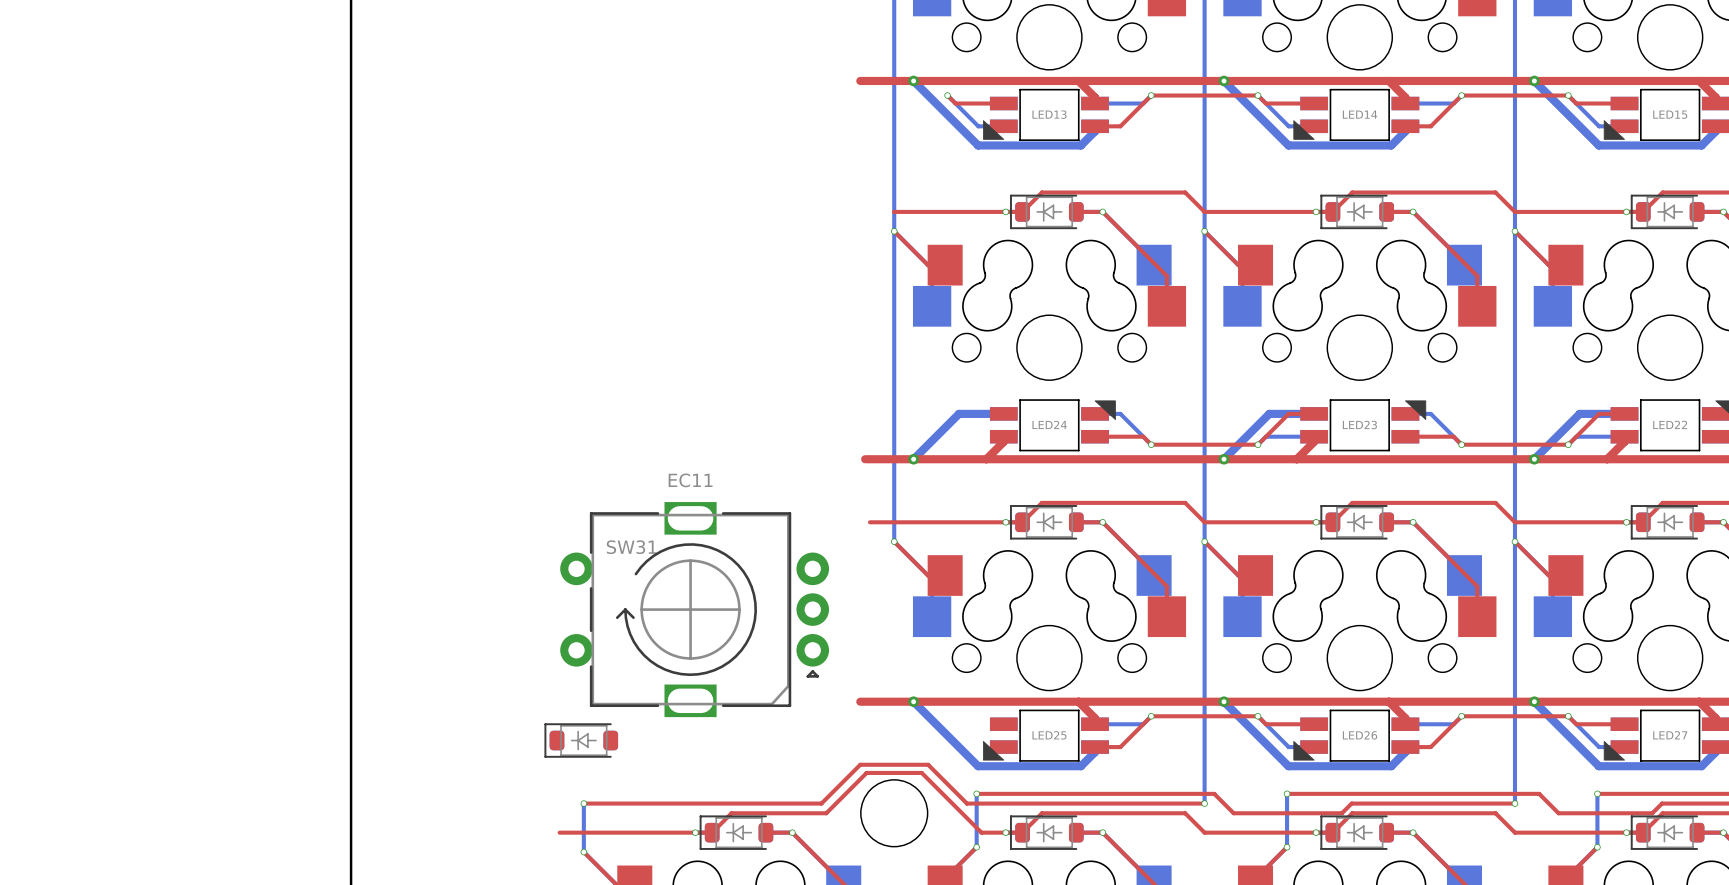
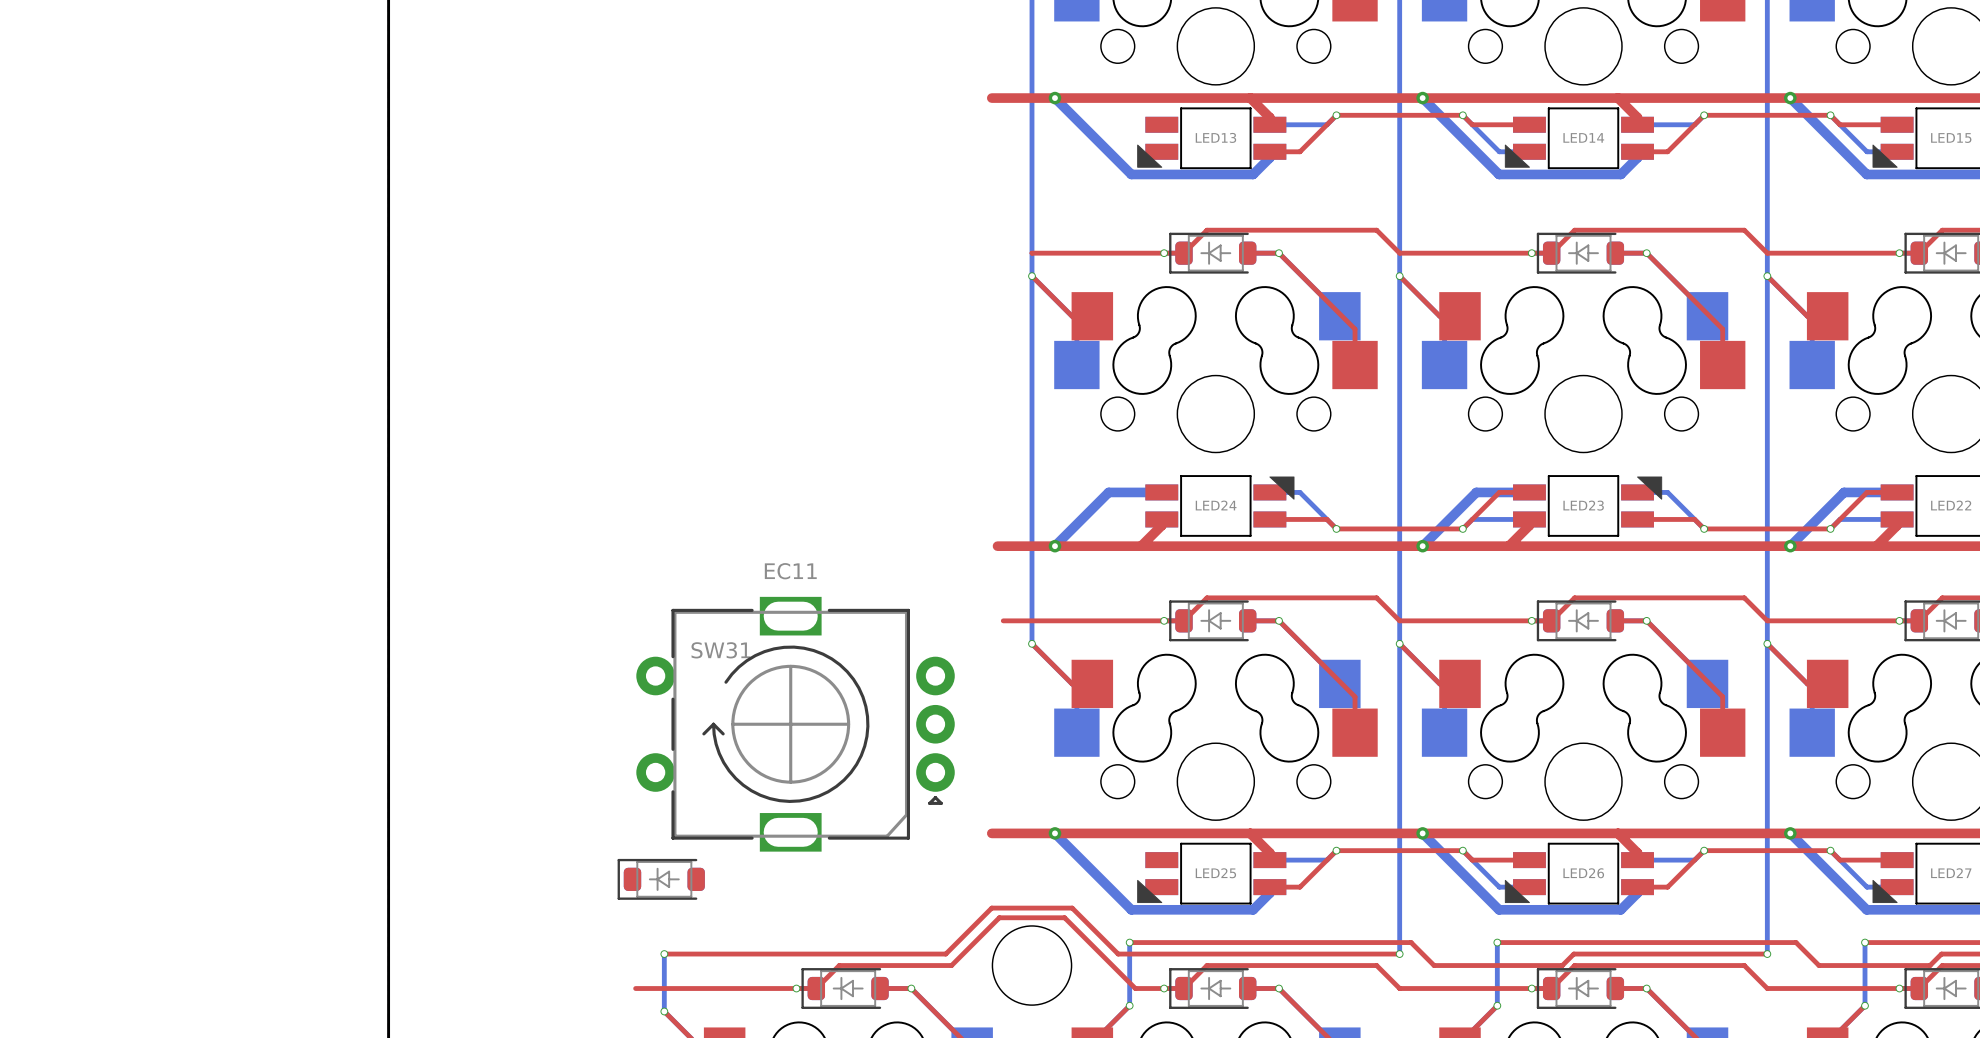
top track: (947, 95) (955, 103) (1003, 103) -> none
bottom track: (947, 95) (978, 126) (1003, 126) -> none
via: (947, 95) -> none

